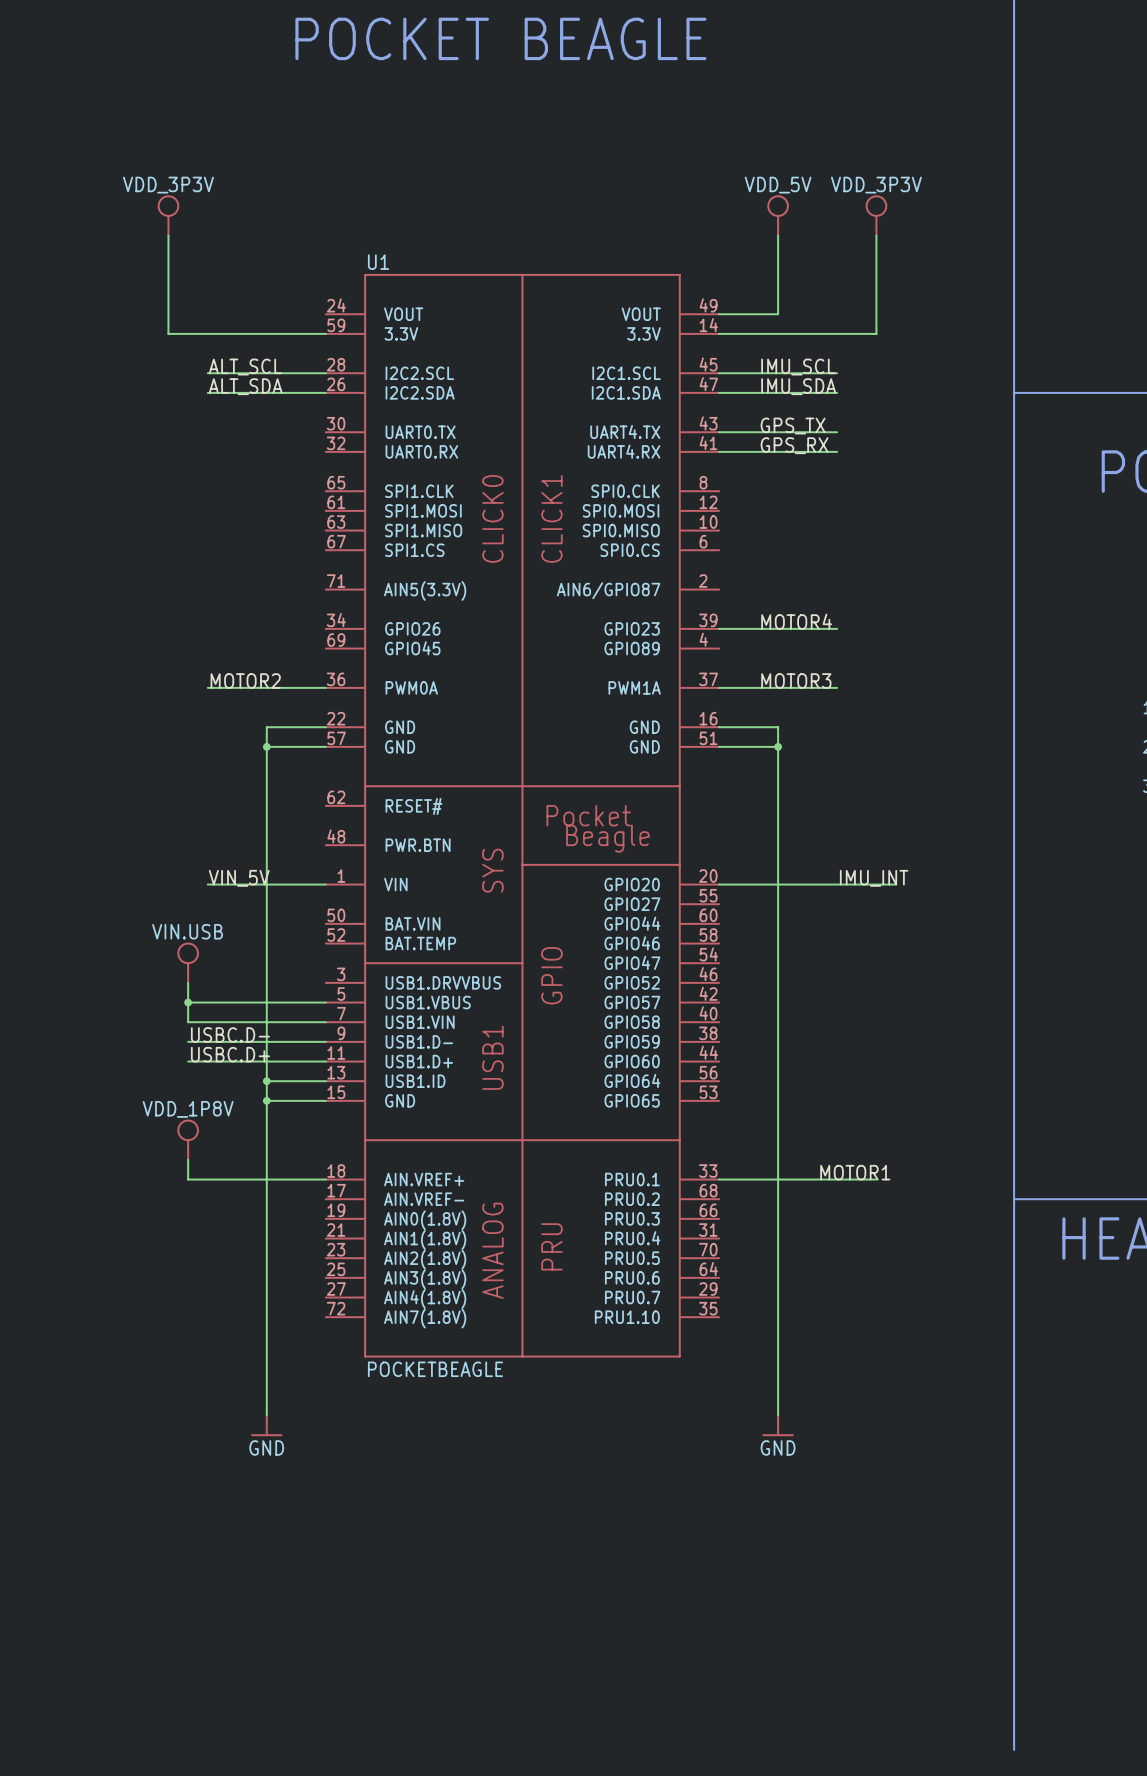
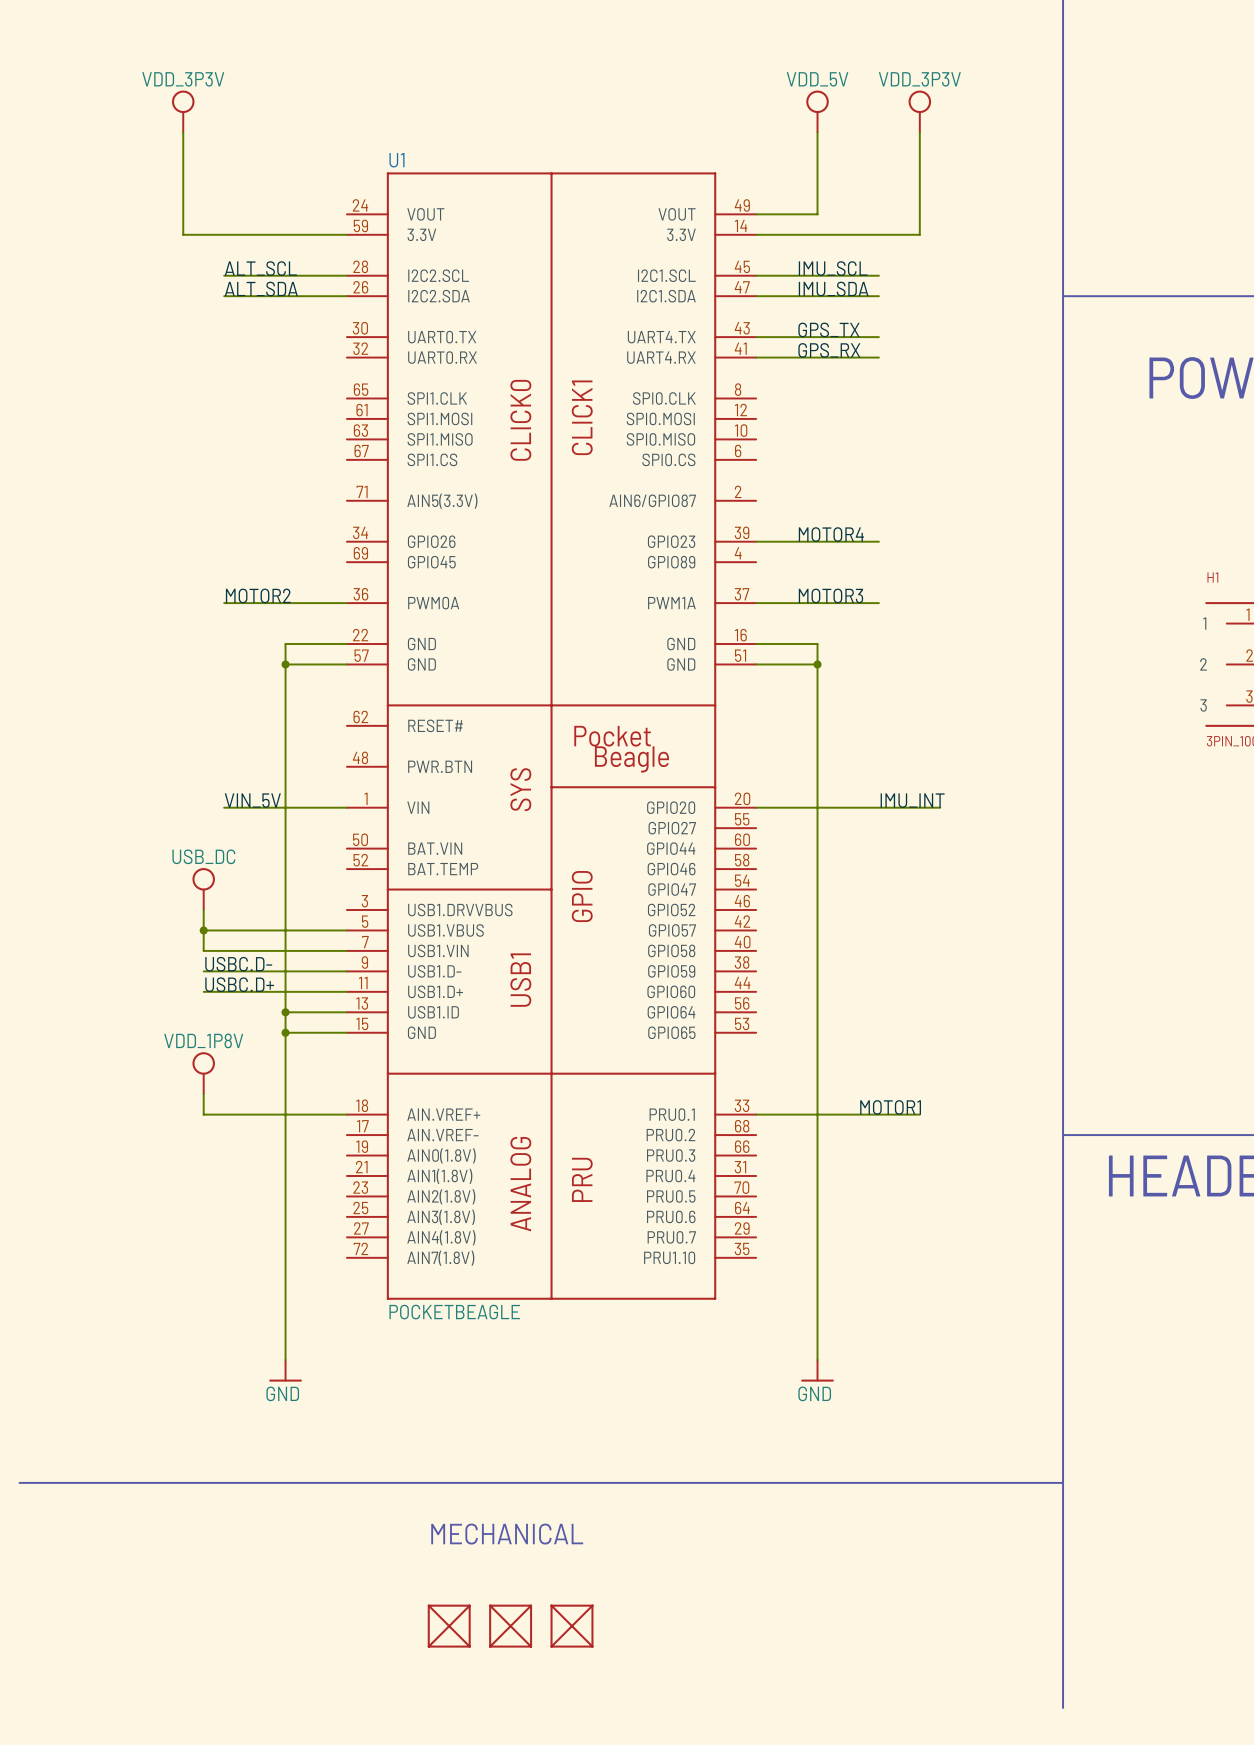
power symbol: VIN.USB (188, 962) -> USB_DC (203, 889)
line: none -> (19, 1482) (1063, 1482)
text: none -> MECHANICAL (507, 1534)
part: none -> (449, 1626)
part: none -> (510, 1626)
part: none -> (571, 1626)

